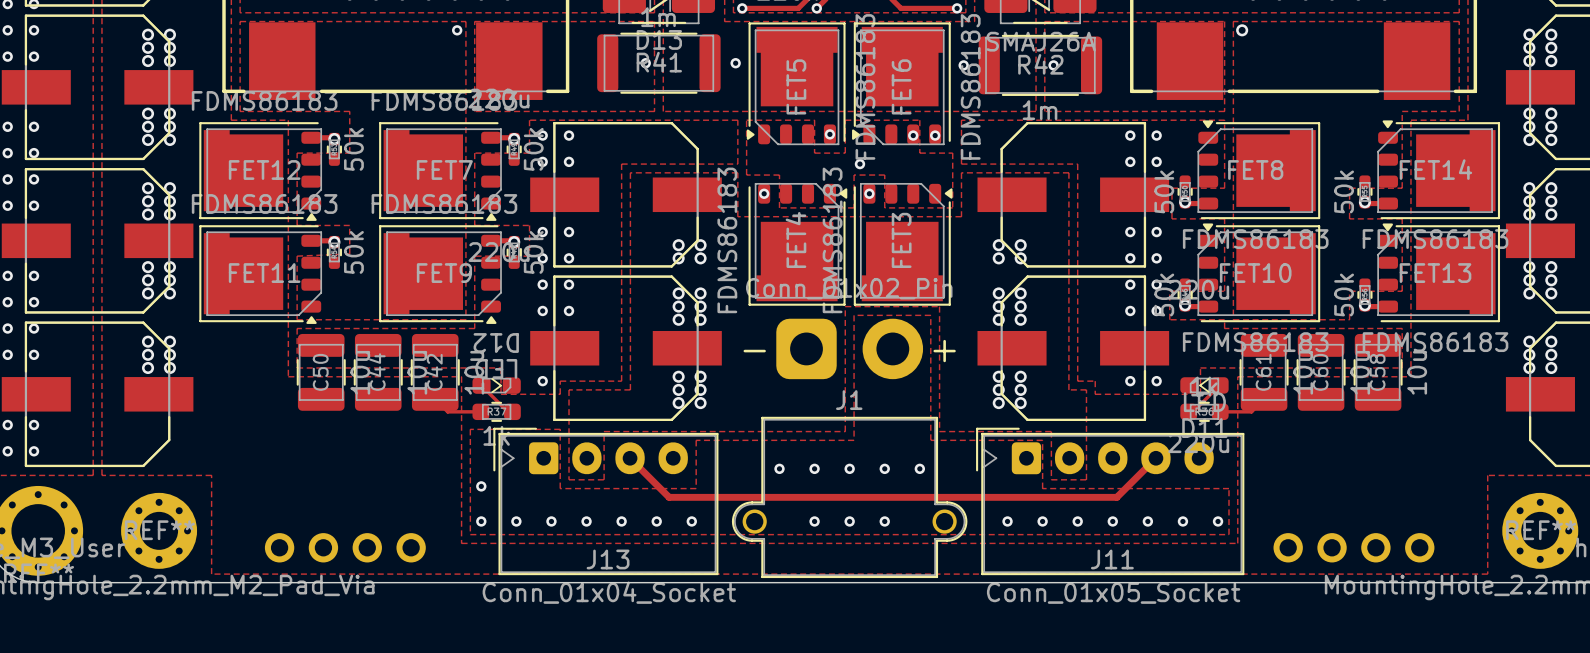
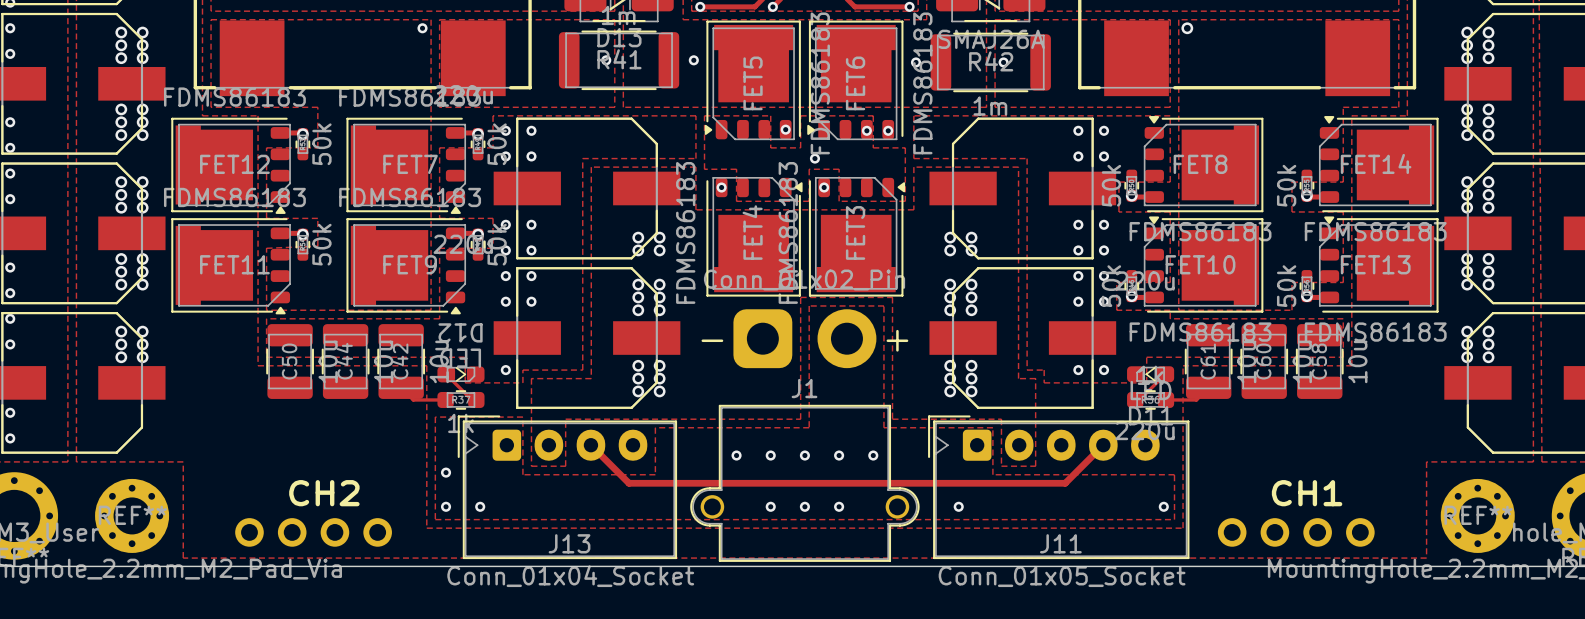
text: none -> CH2 (324, 493)
text: none -> CH1 (1307, 493)
via: (551, 521) -> none
via: (586, 521) -> none
via: (621, 521) -> none
via: (656, 521) -> none
via: (691, 521) -> none
via: (1042, 521) -> none
via: (1077, 521) -> none
via: (1112, 521) -> none
via: (1147, 521) -> none
via: (1182, 521) -> none

